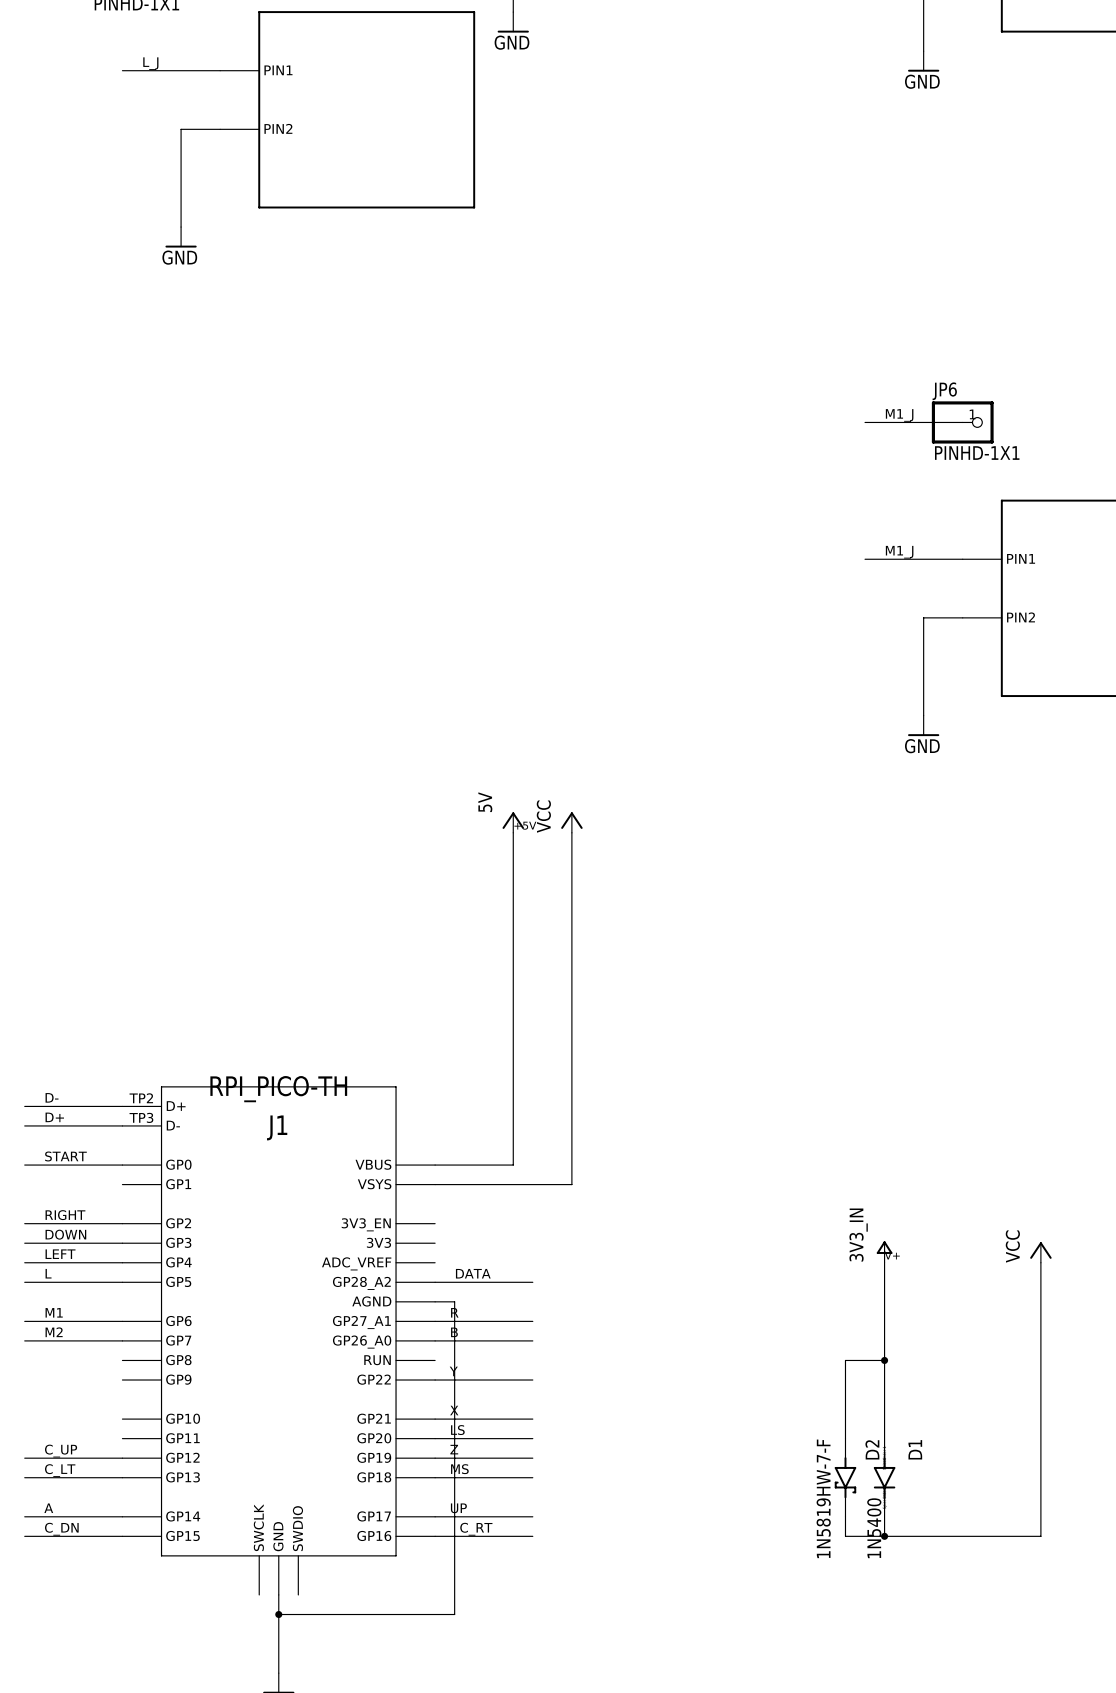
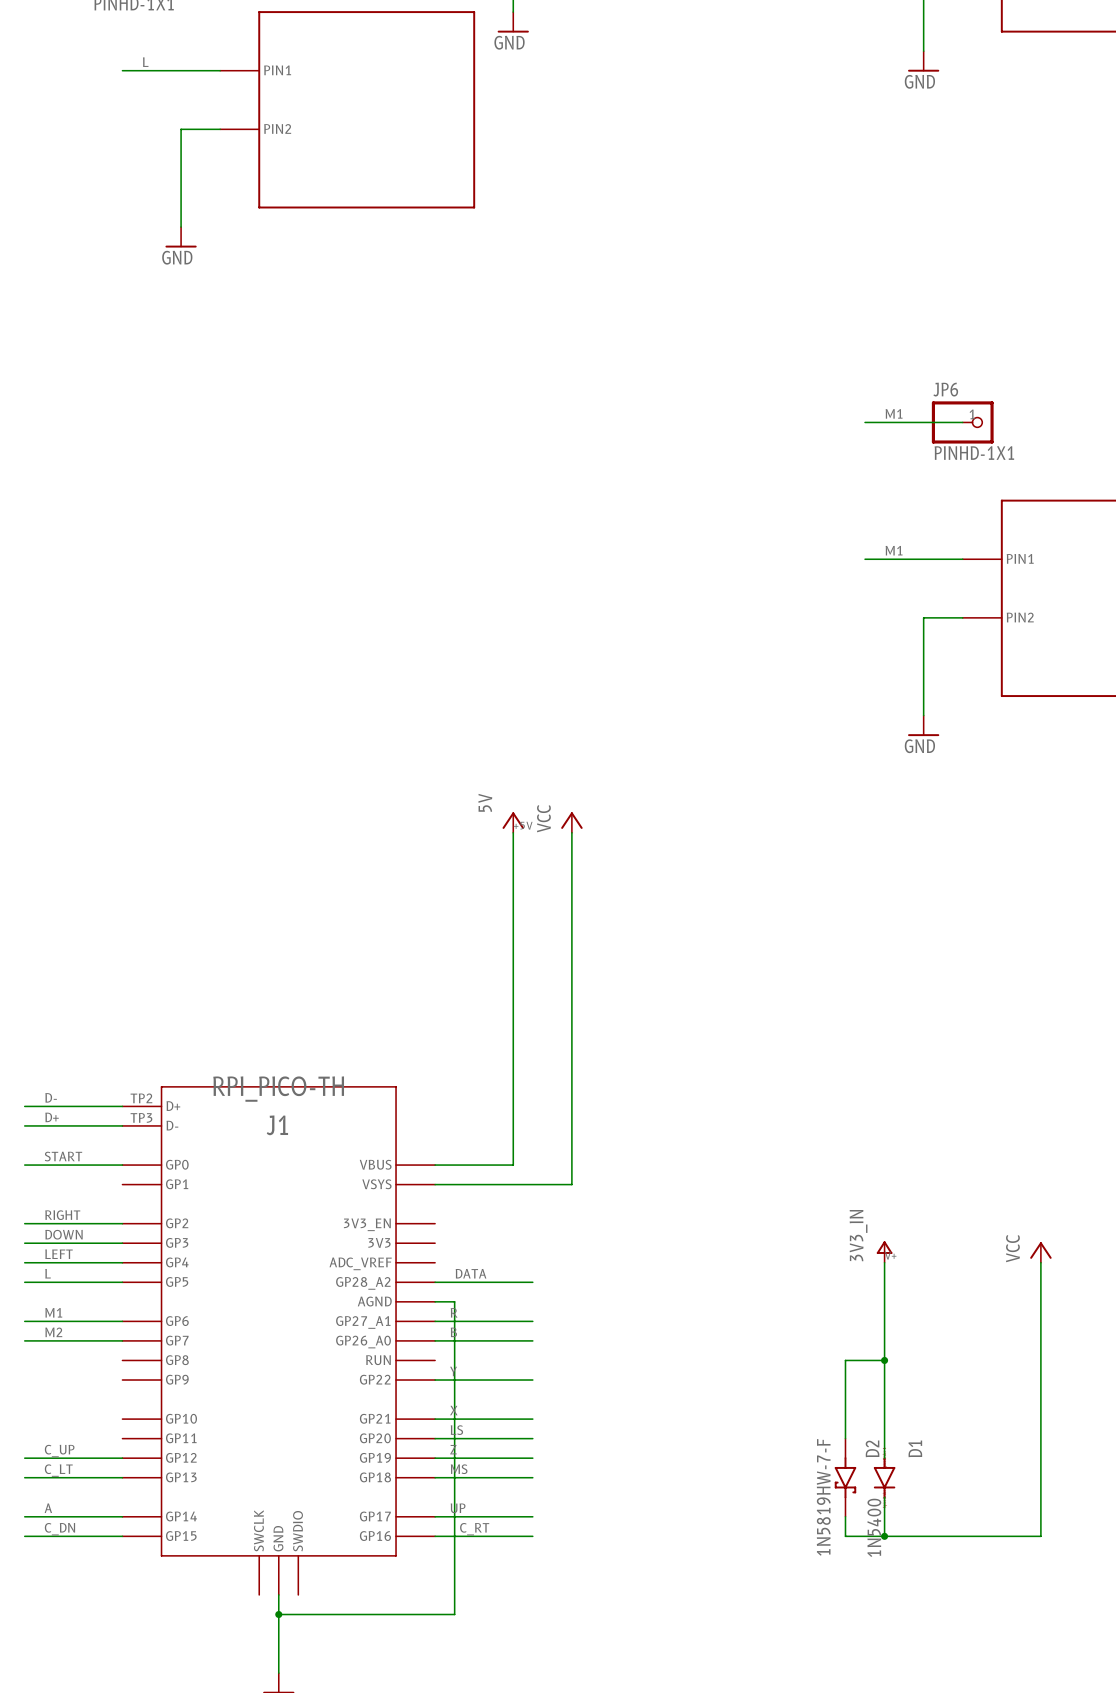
label: L_J (150, 63) -> L (145, 62)
label: M1_J (899, 415) -> M1 (894, 413)
label: M1_J (899, 552) -> M1 (894, 550)

